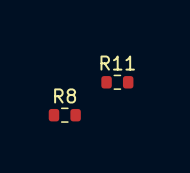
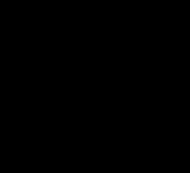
R11: (117, 82) -> none
R8: (64, 115) -> none

